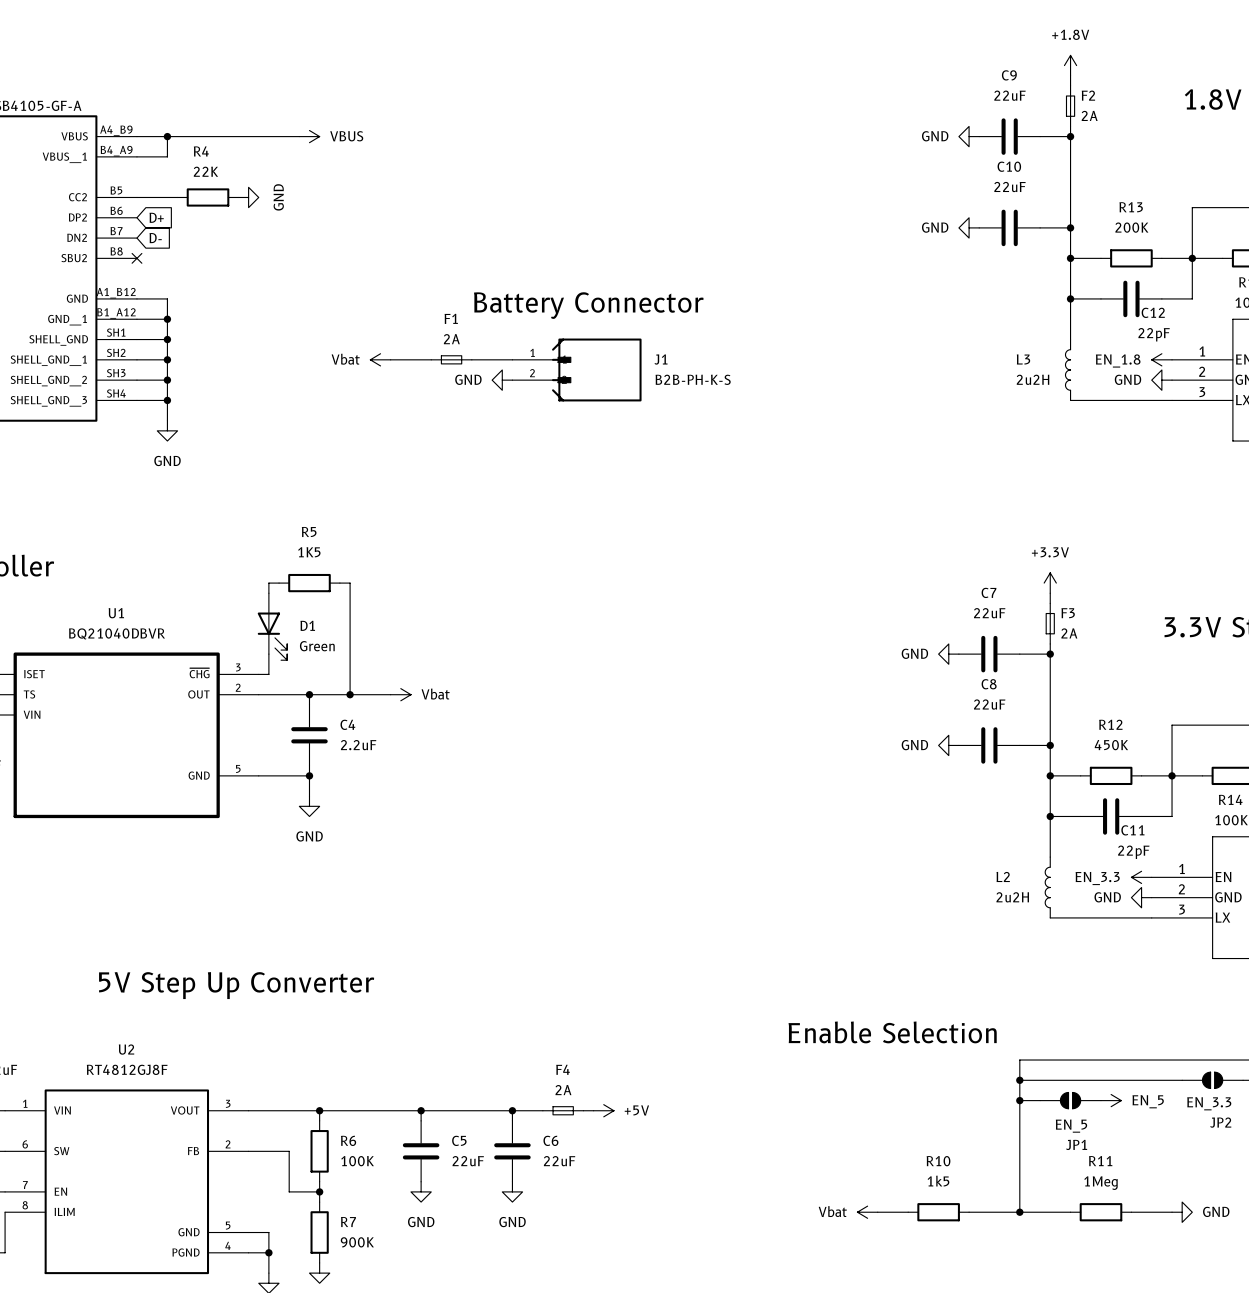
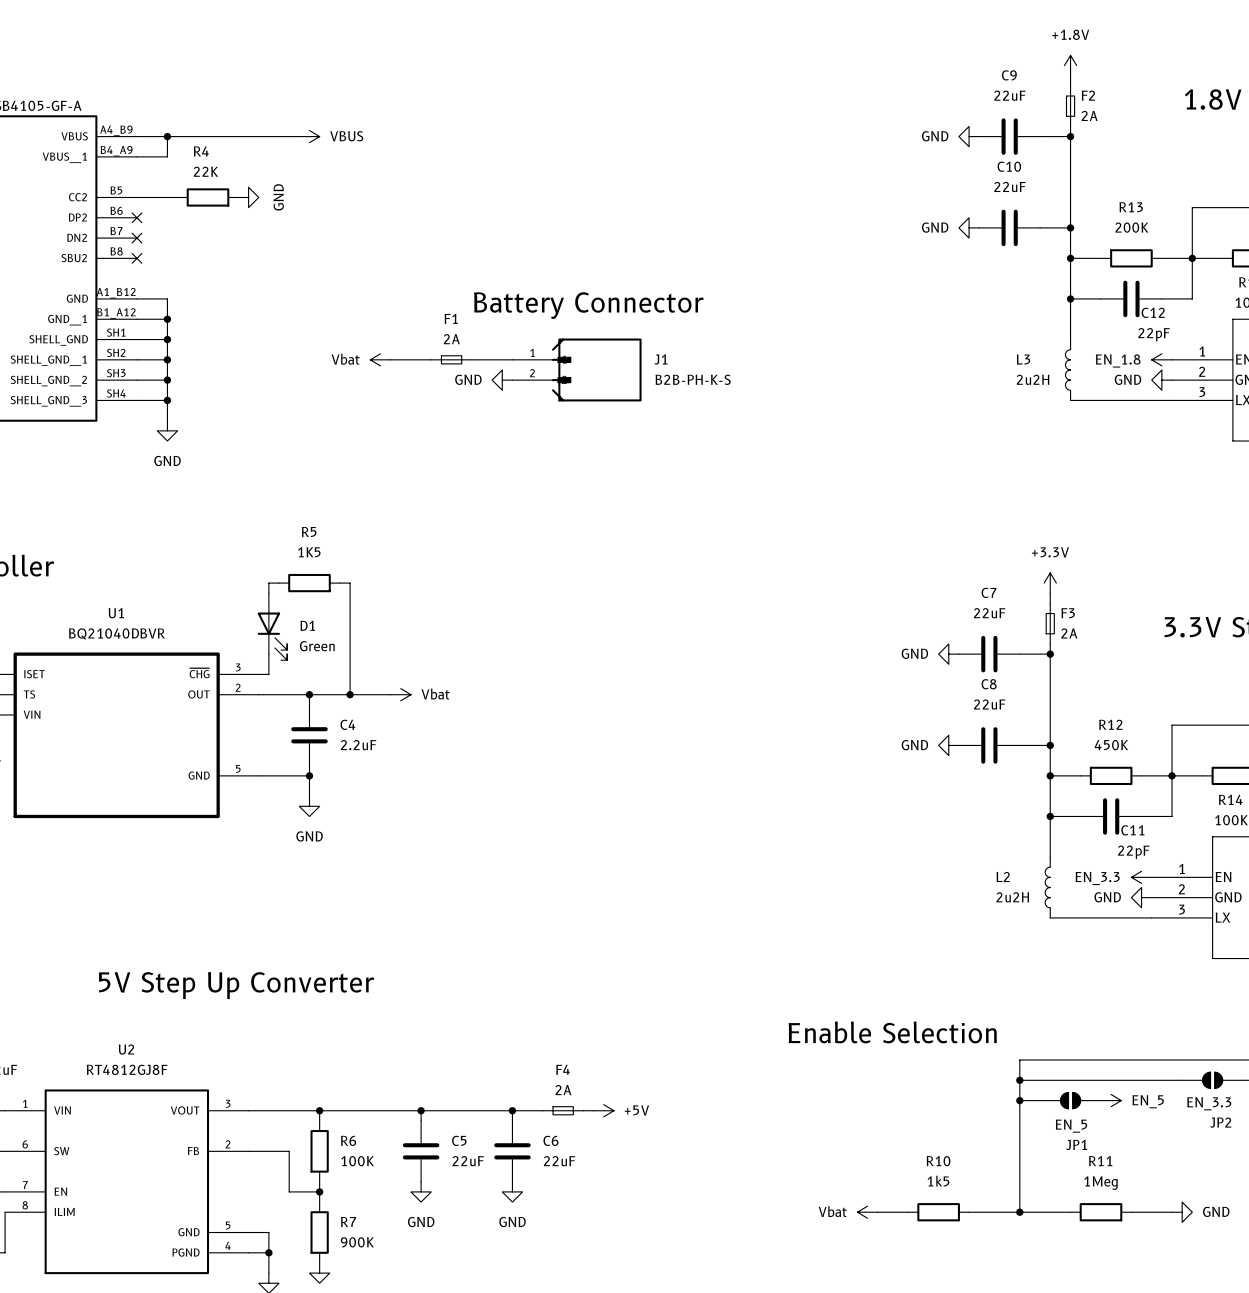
no-connect mark: none -> (136, 217)
global label: D+ (156, 217) -> none
no-connect mark: none -> (136, 238)
global label: D- (155, 238) -> none

